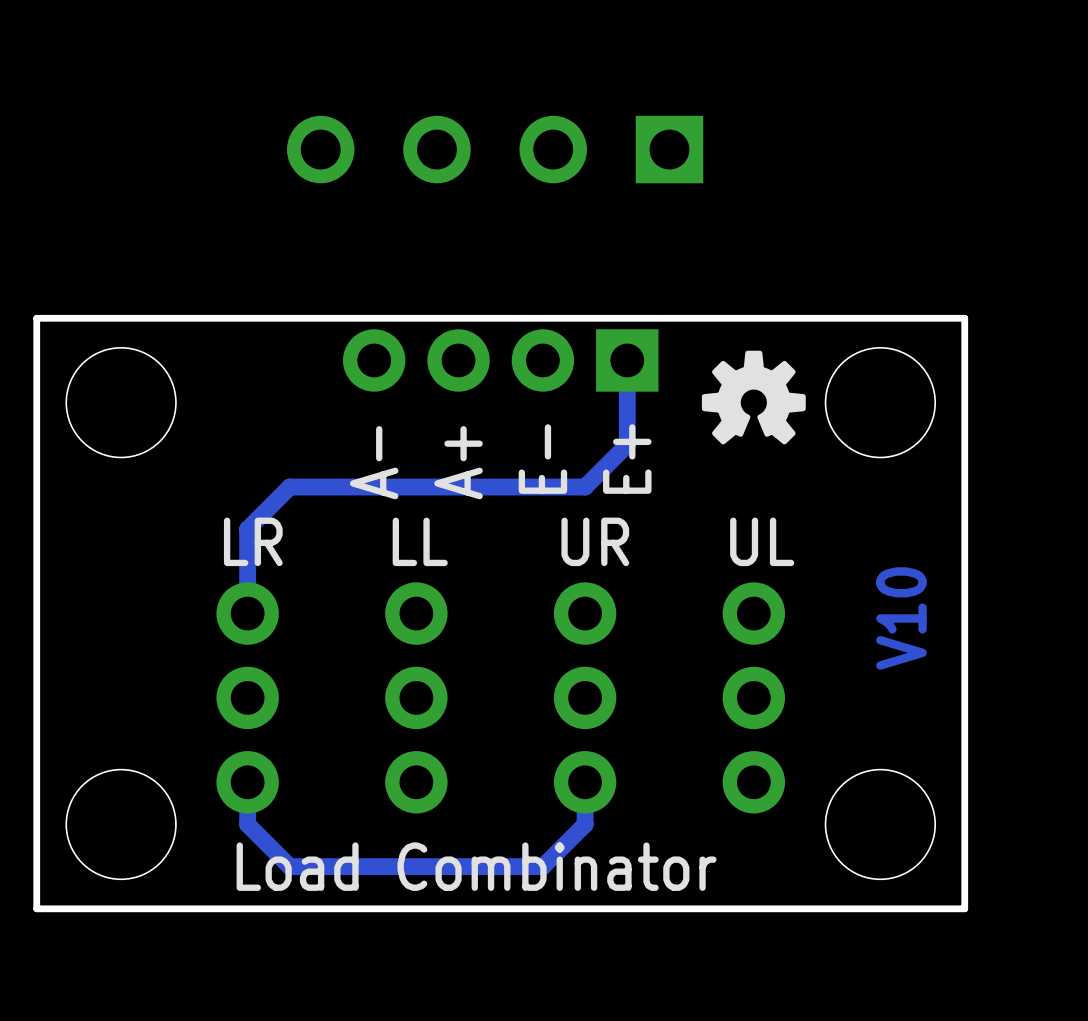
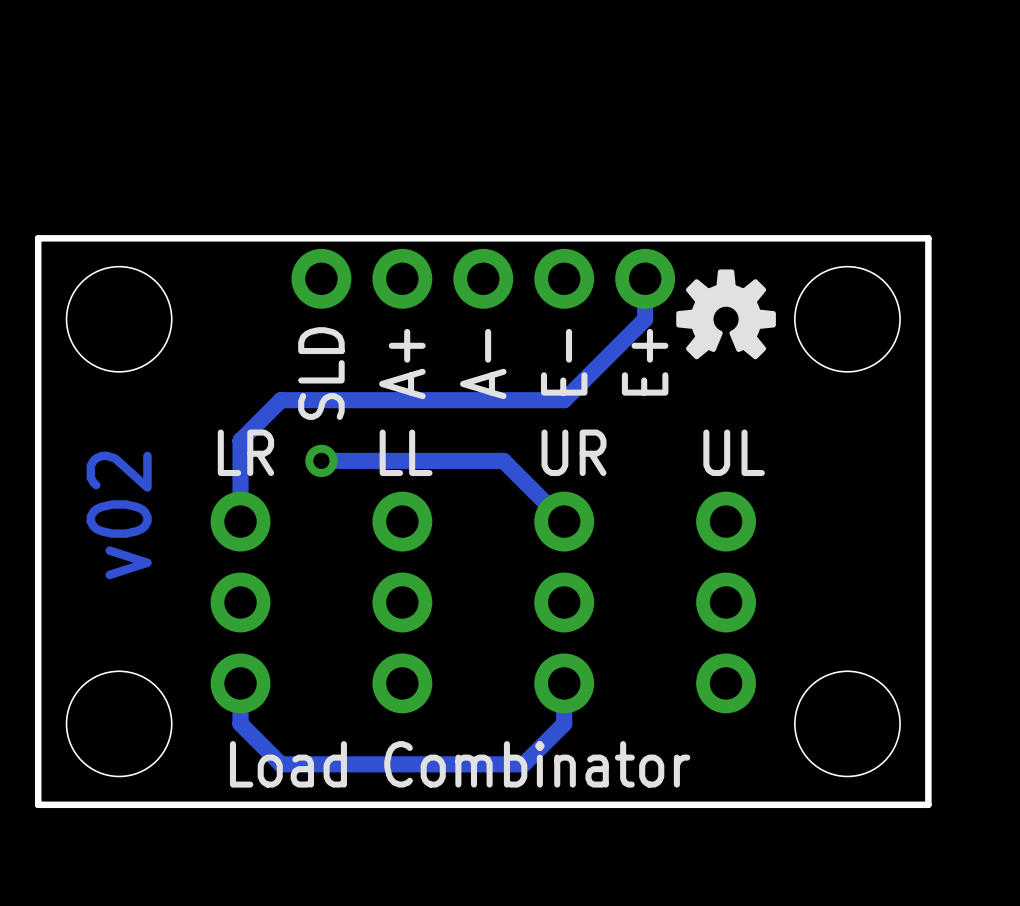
part: (495, 149) -> none
part footprint: [342, 329, 659, 392] -> [291, 248, 676, 309]
track: (627, 360) (627, 444) -> (645, 278) (645, 319) (604, 359)
text: none -> SLD (321, 373)
text position: E- (542, 459) -> E- (564, 362)
text position: E+ (627, 459) -> E+ (645, 362)
text position: A- (374, 462) -> A- (483, 364)
text position: A+ (458, 462) -> A+ (402, 364)
track: none -> (321, 460) (503, 460) (564, 521)
via: none -> (321, 460)
text: none -> v02 (119, 515)
text: V10 (901, 618) -> none

